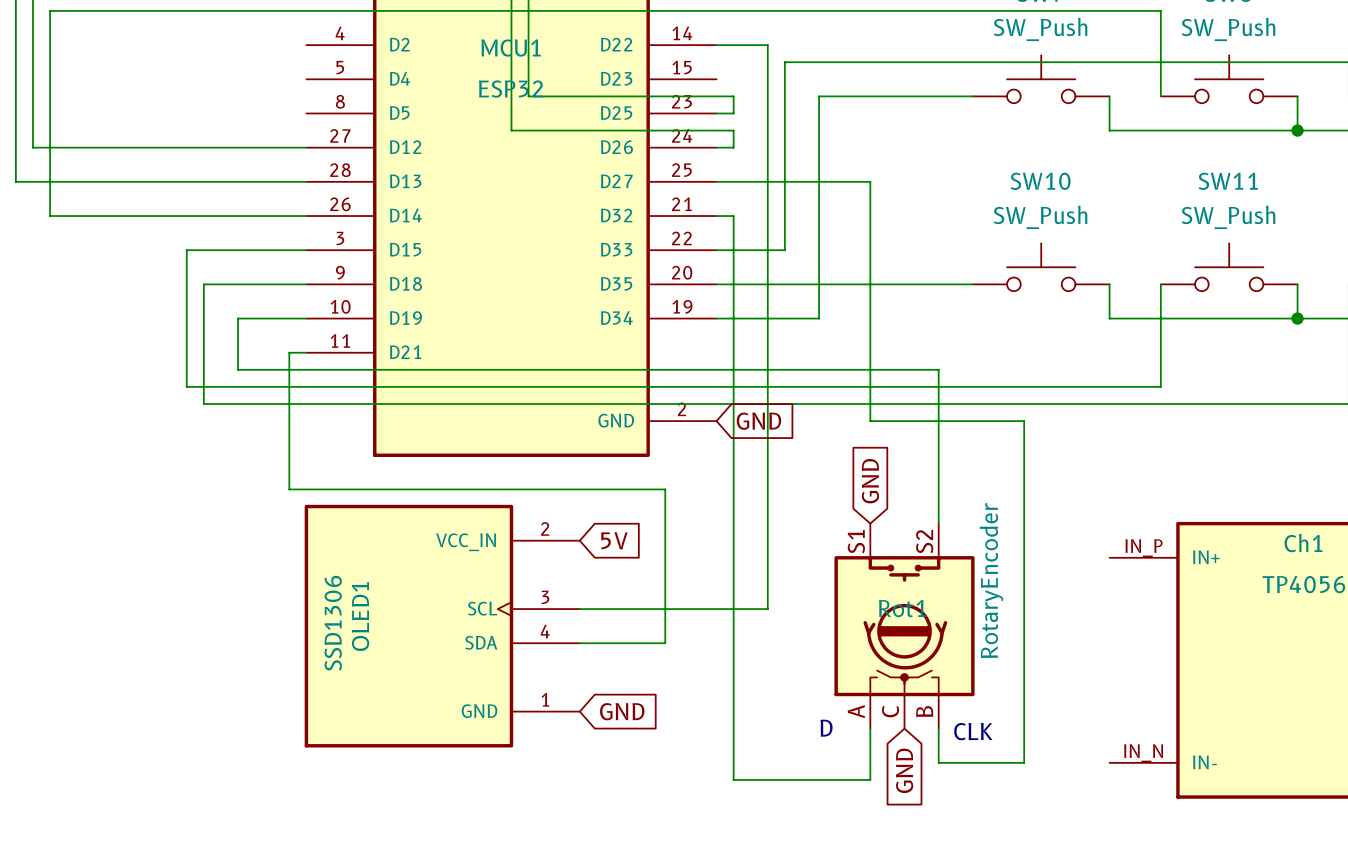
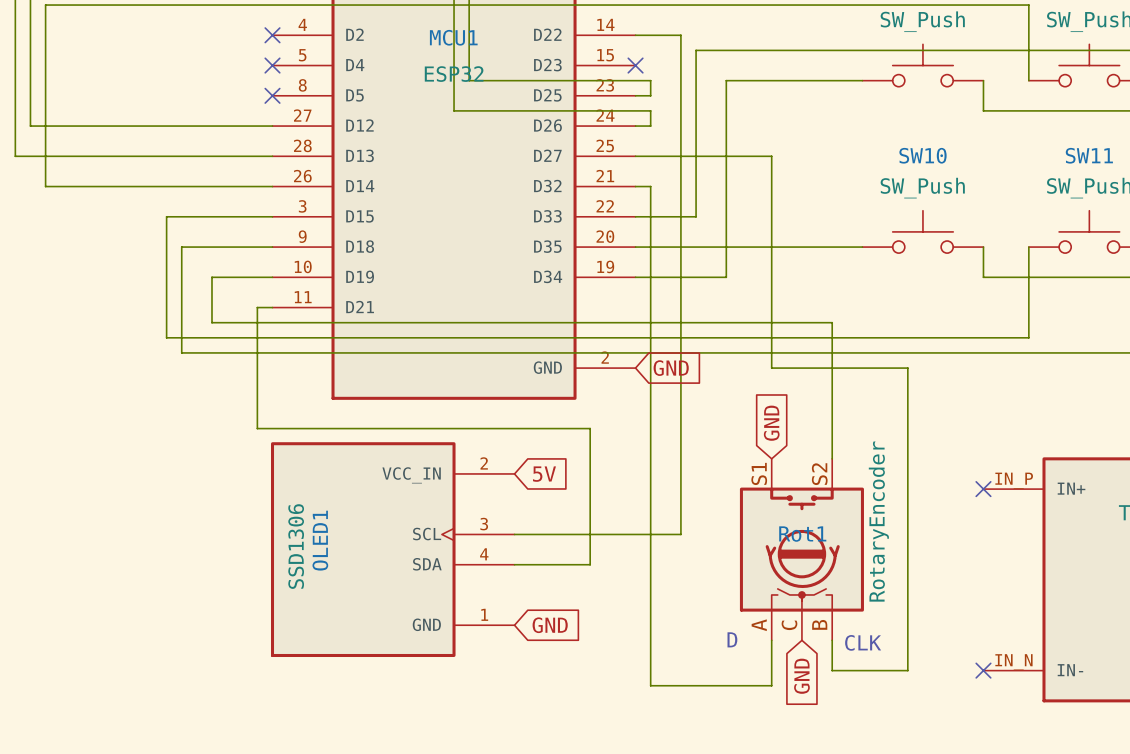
no-connect mark: none -> (272, 35)
no-connect mark: none -> (272, 65)
no-connect mark: none -> (635, 65)
no-connect mark: none -> (272, 95)
no-connect mark: none -> (983, 489)
no-connect mark: none -> (983, 670)

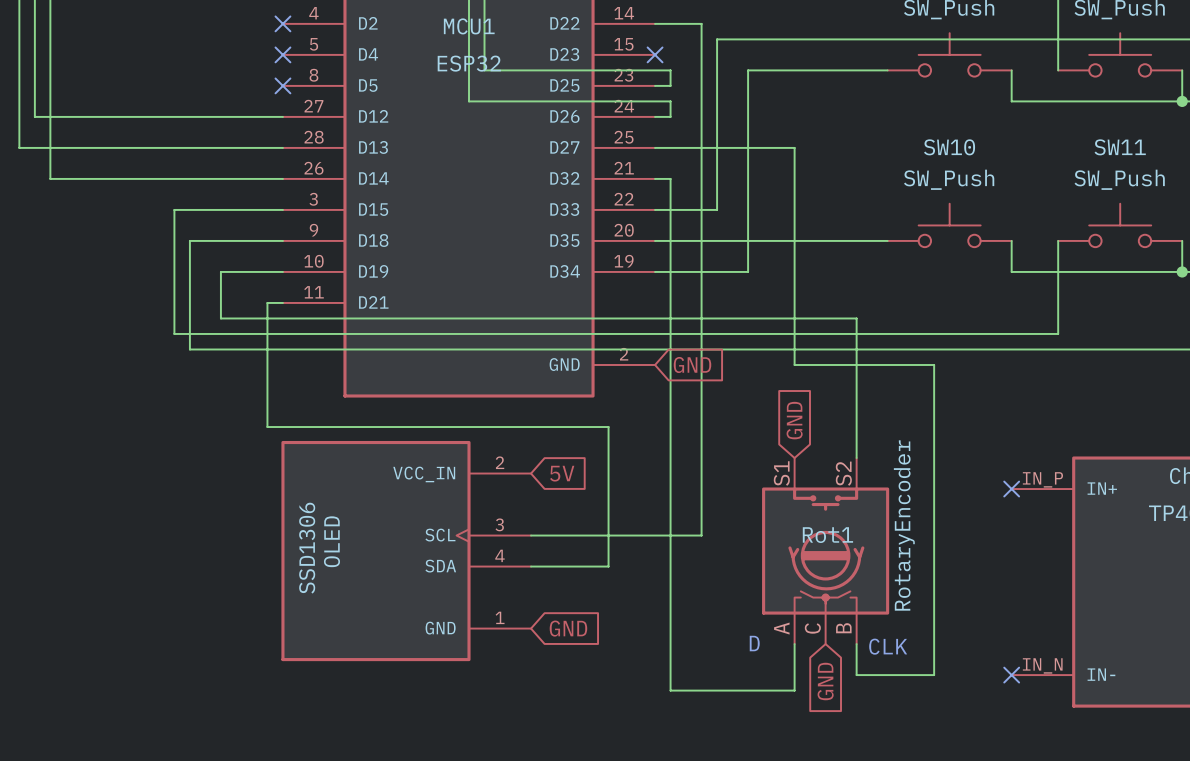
OLED1 name: OLED1 (320, 540) -> OLED (331, 541)

